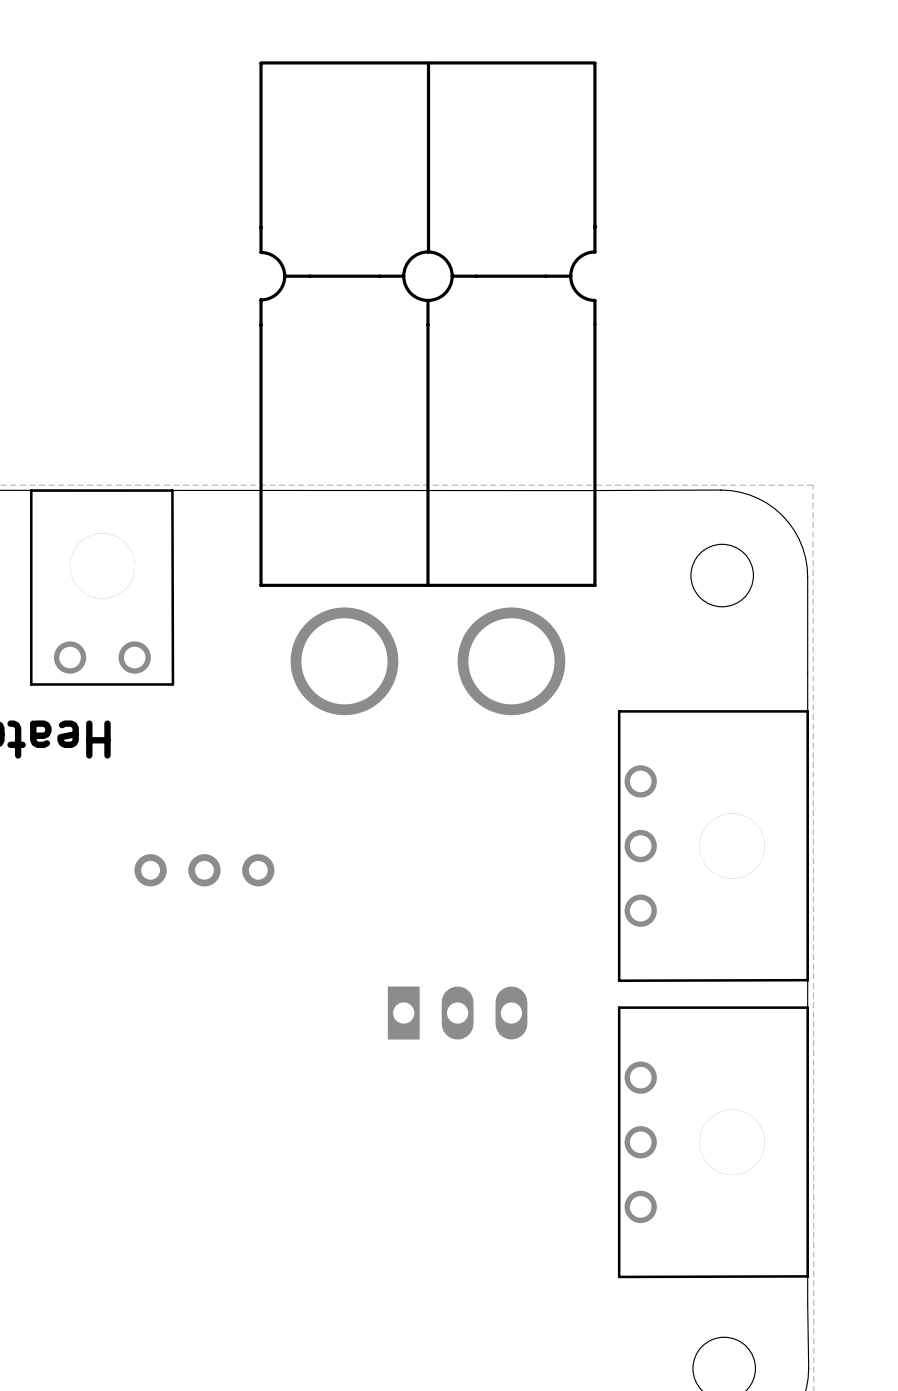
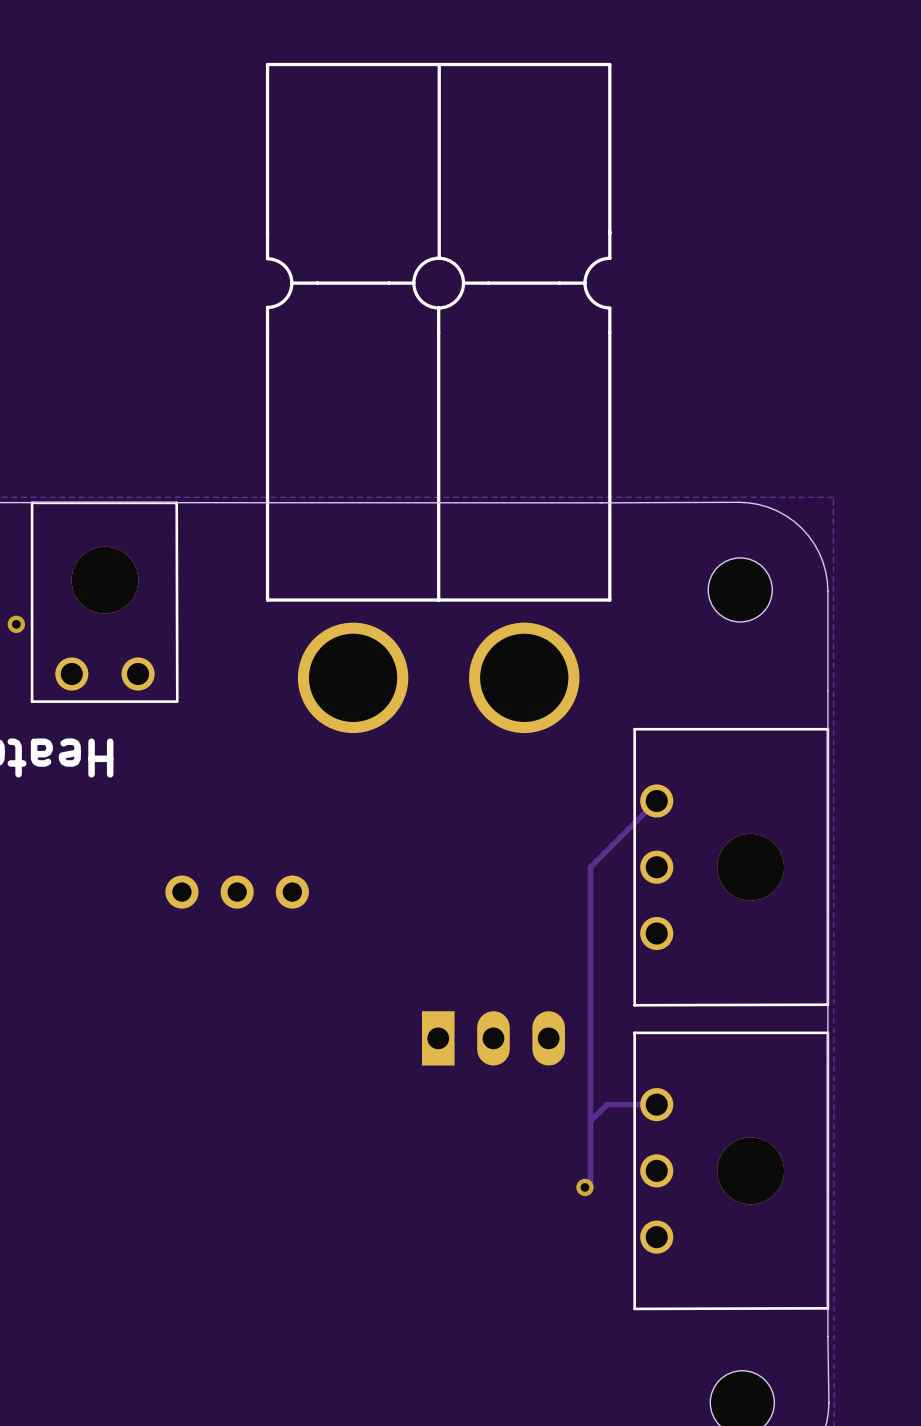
via: none -> (16, 624)
track: none -> (656, 800) (590, 867) (590, 1181) (584, 1187)
part position: (204, 870) -> (237, 892)
part position: (457, 1013) -> (493, 1038)
track: none -> (656, 1104) (607, 1104) (590, 1121)
via: none -> (584, 1187)

